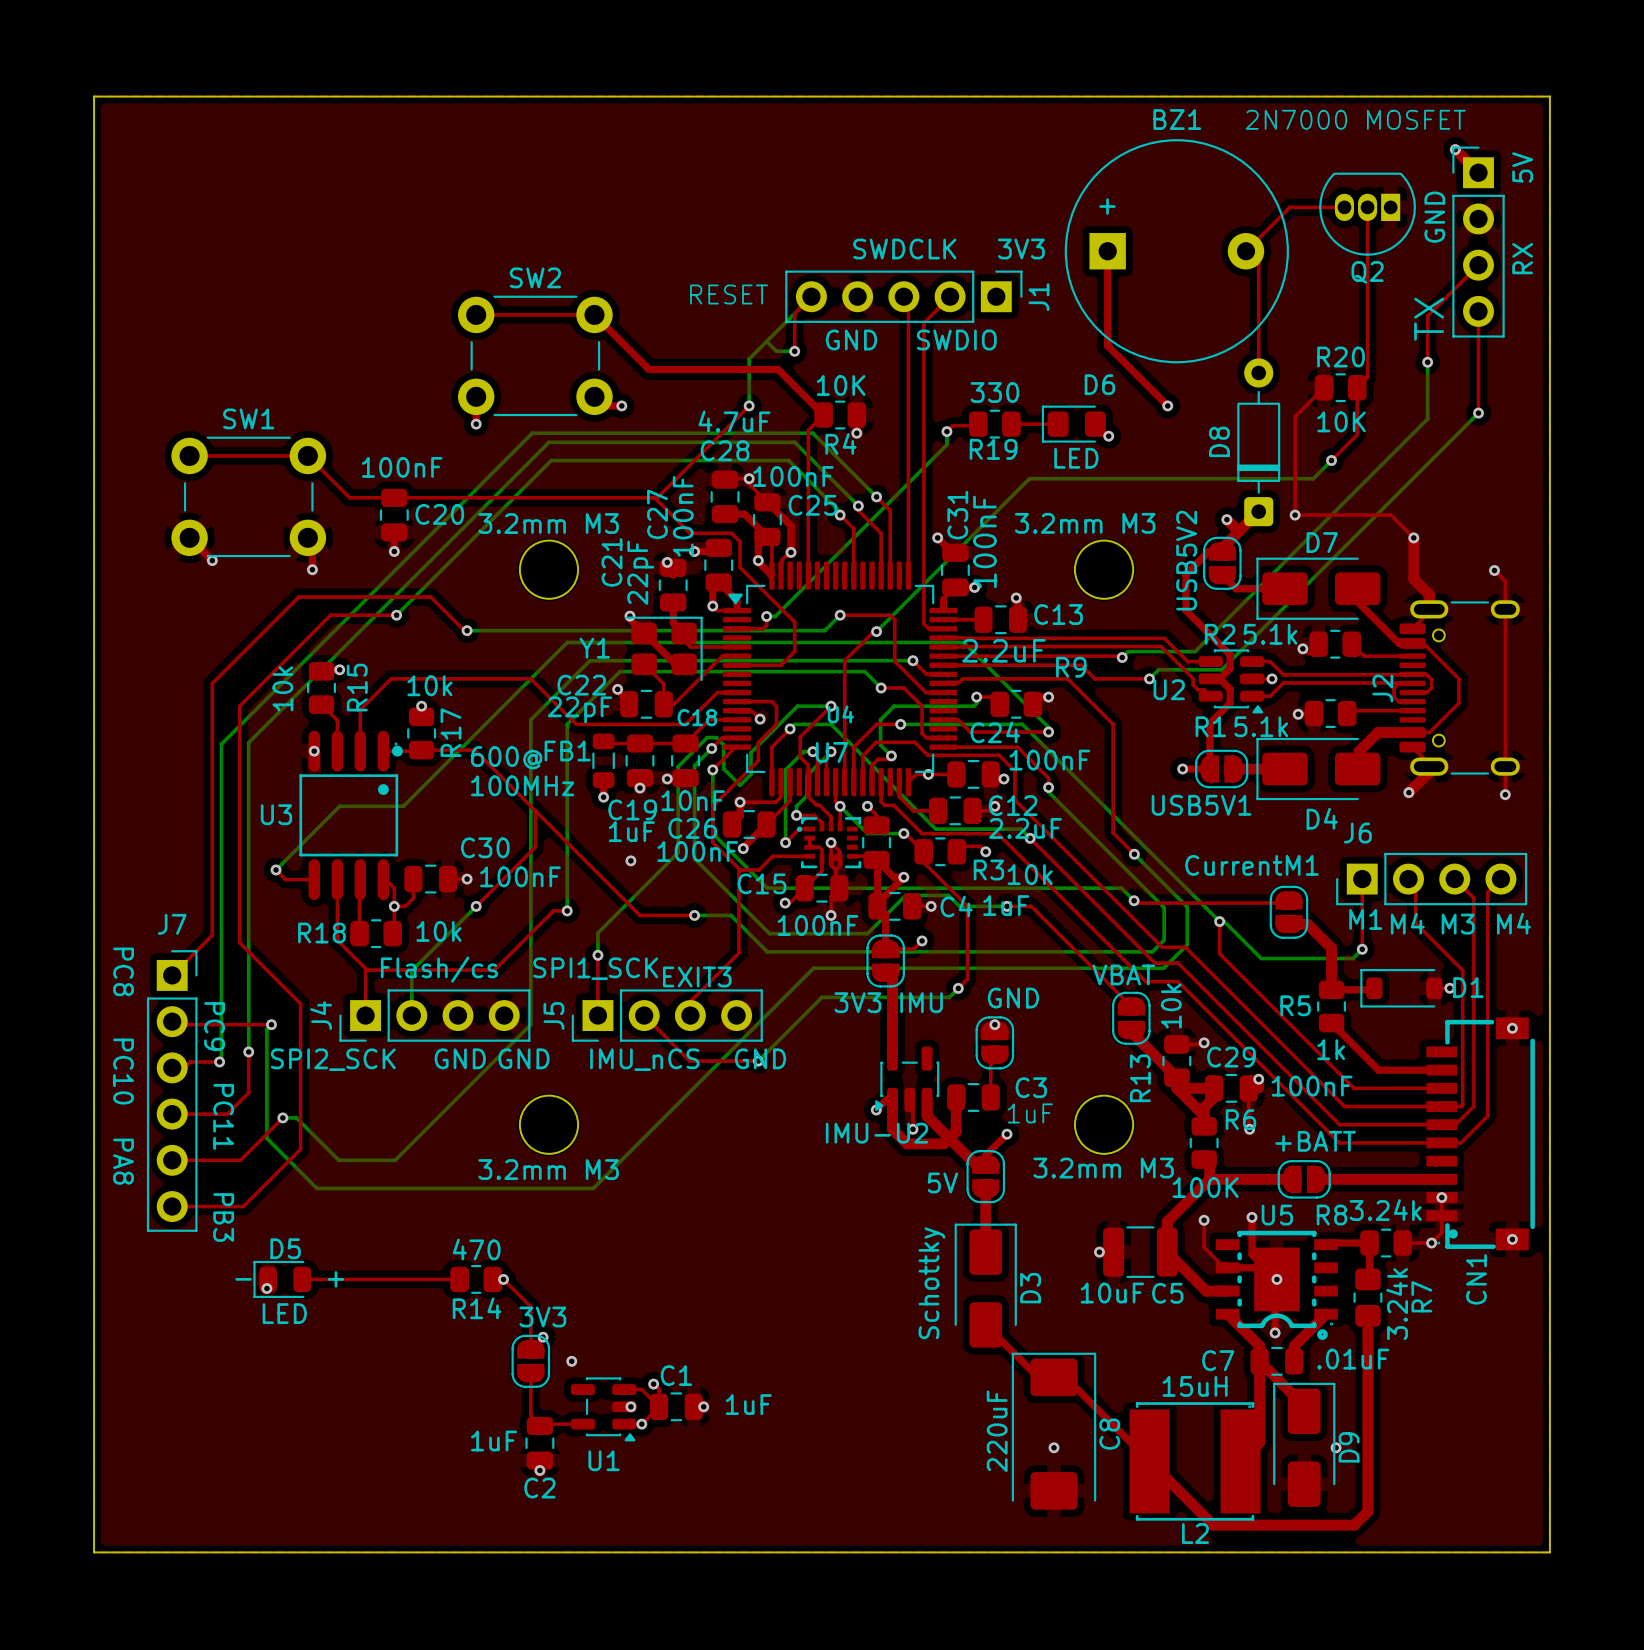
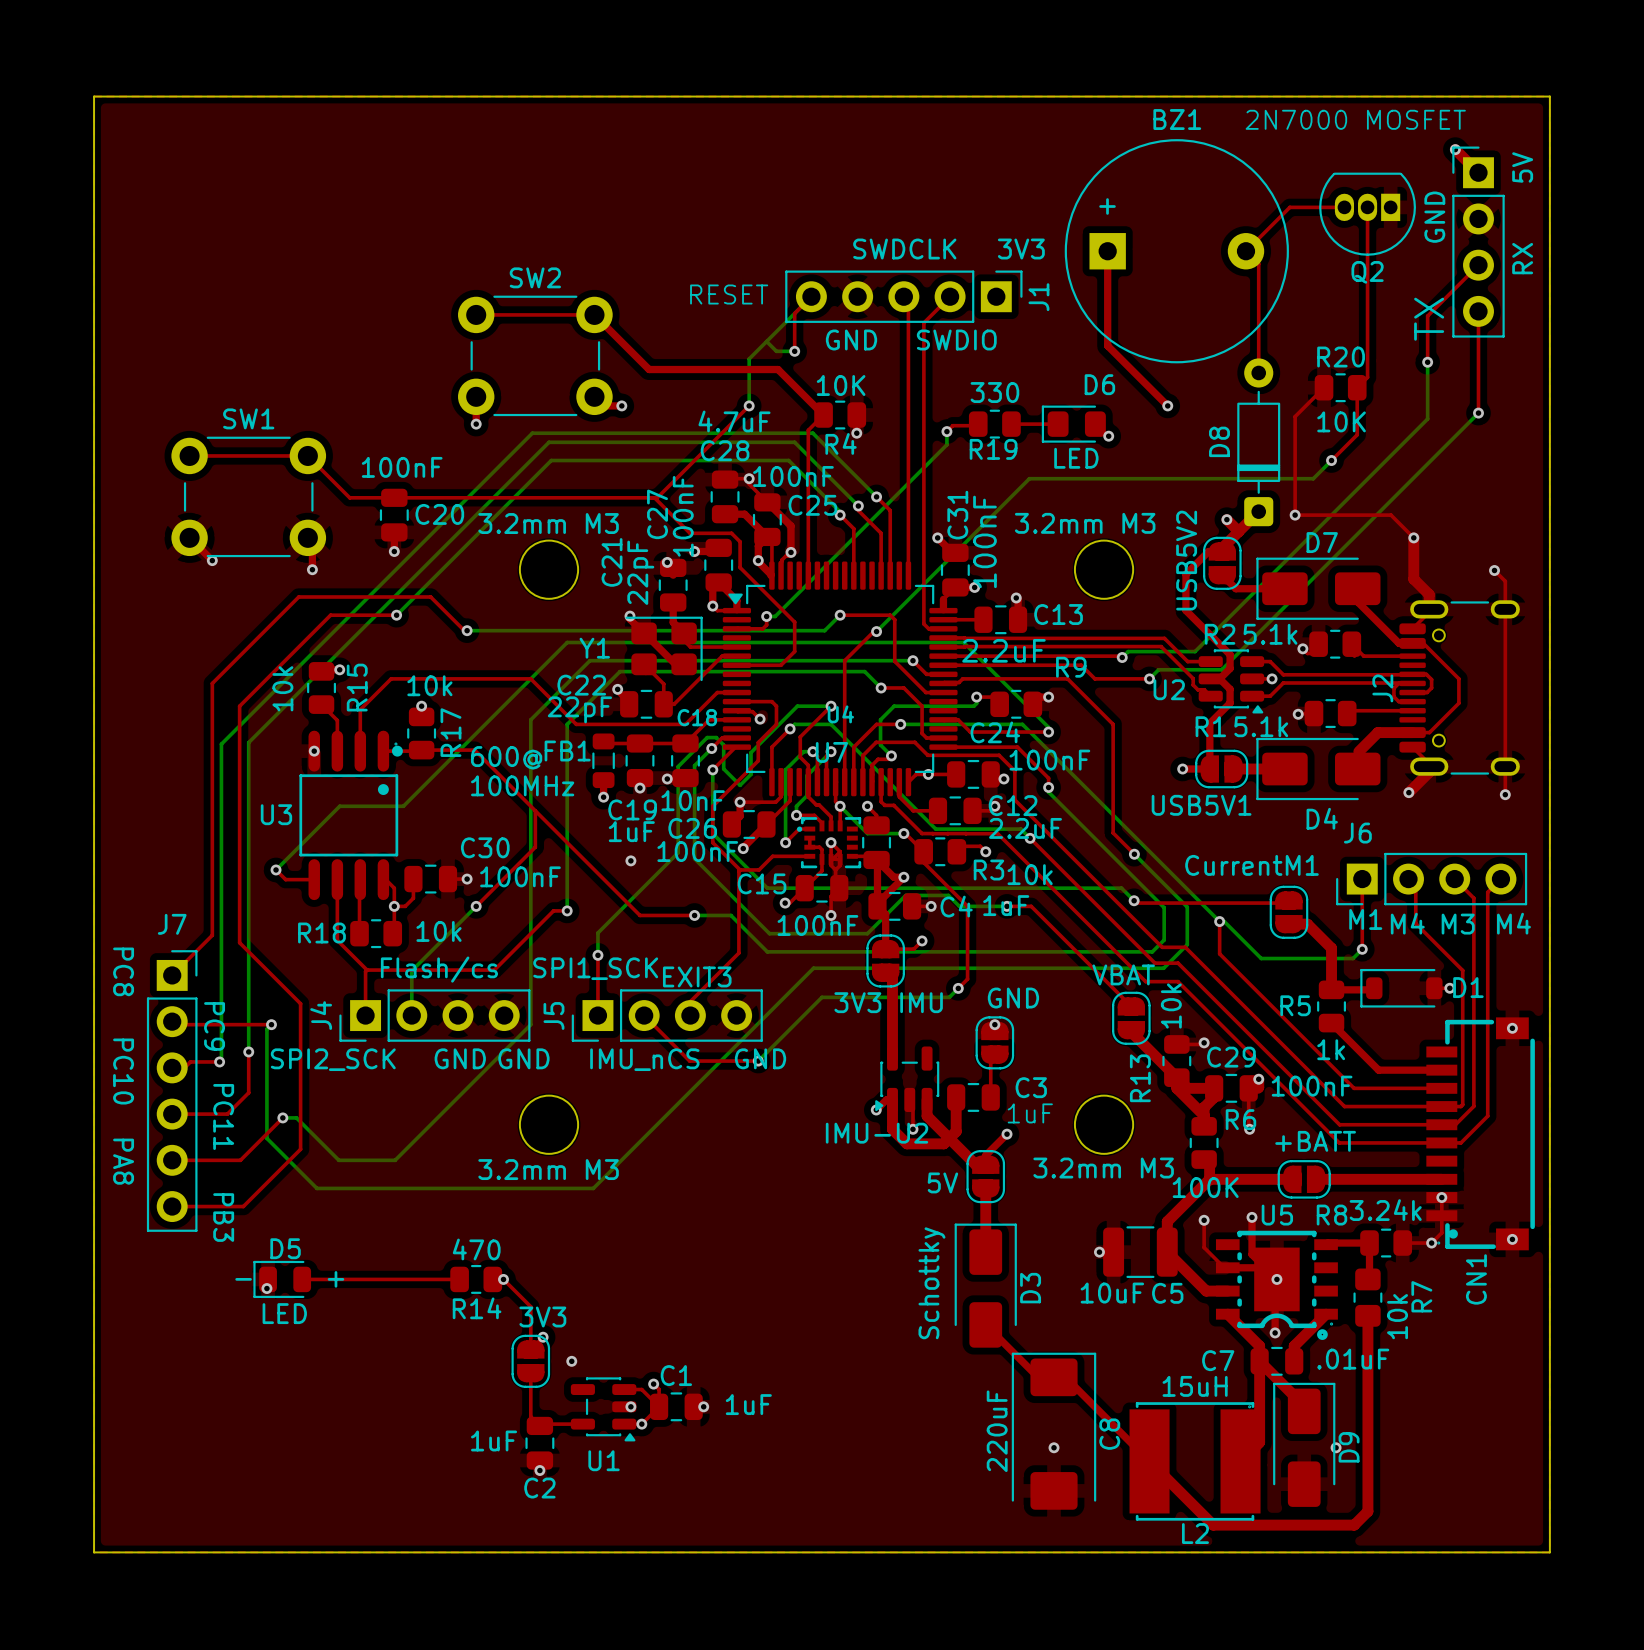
text: 3.24k (1397, 1304) -> 10k (1397, 1316)

